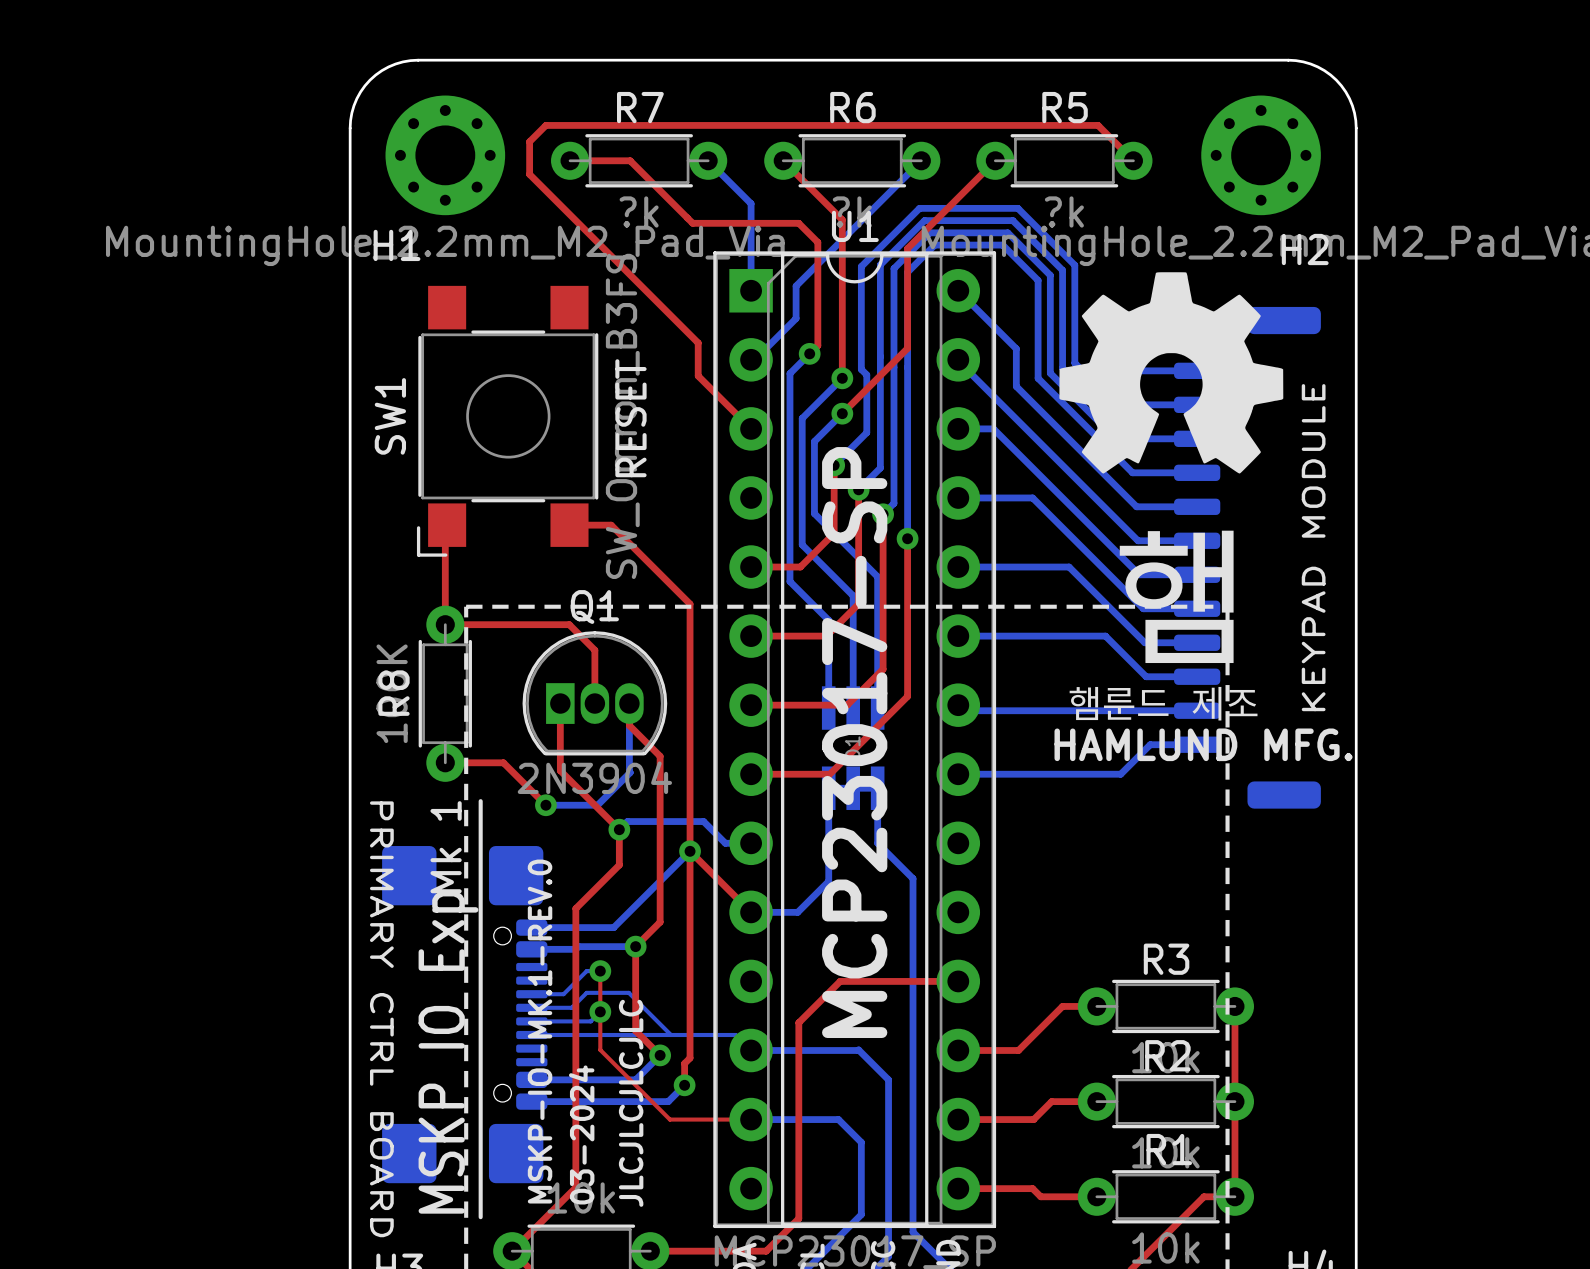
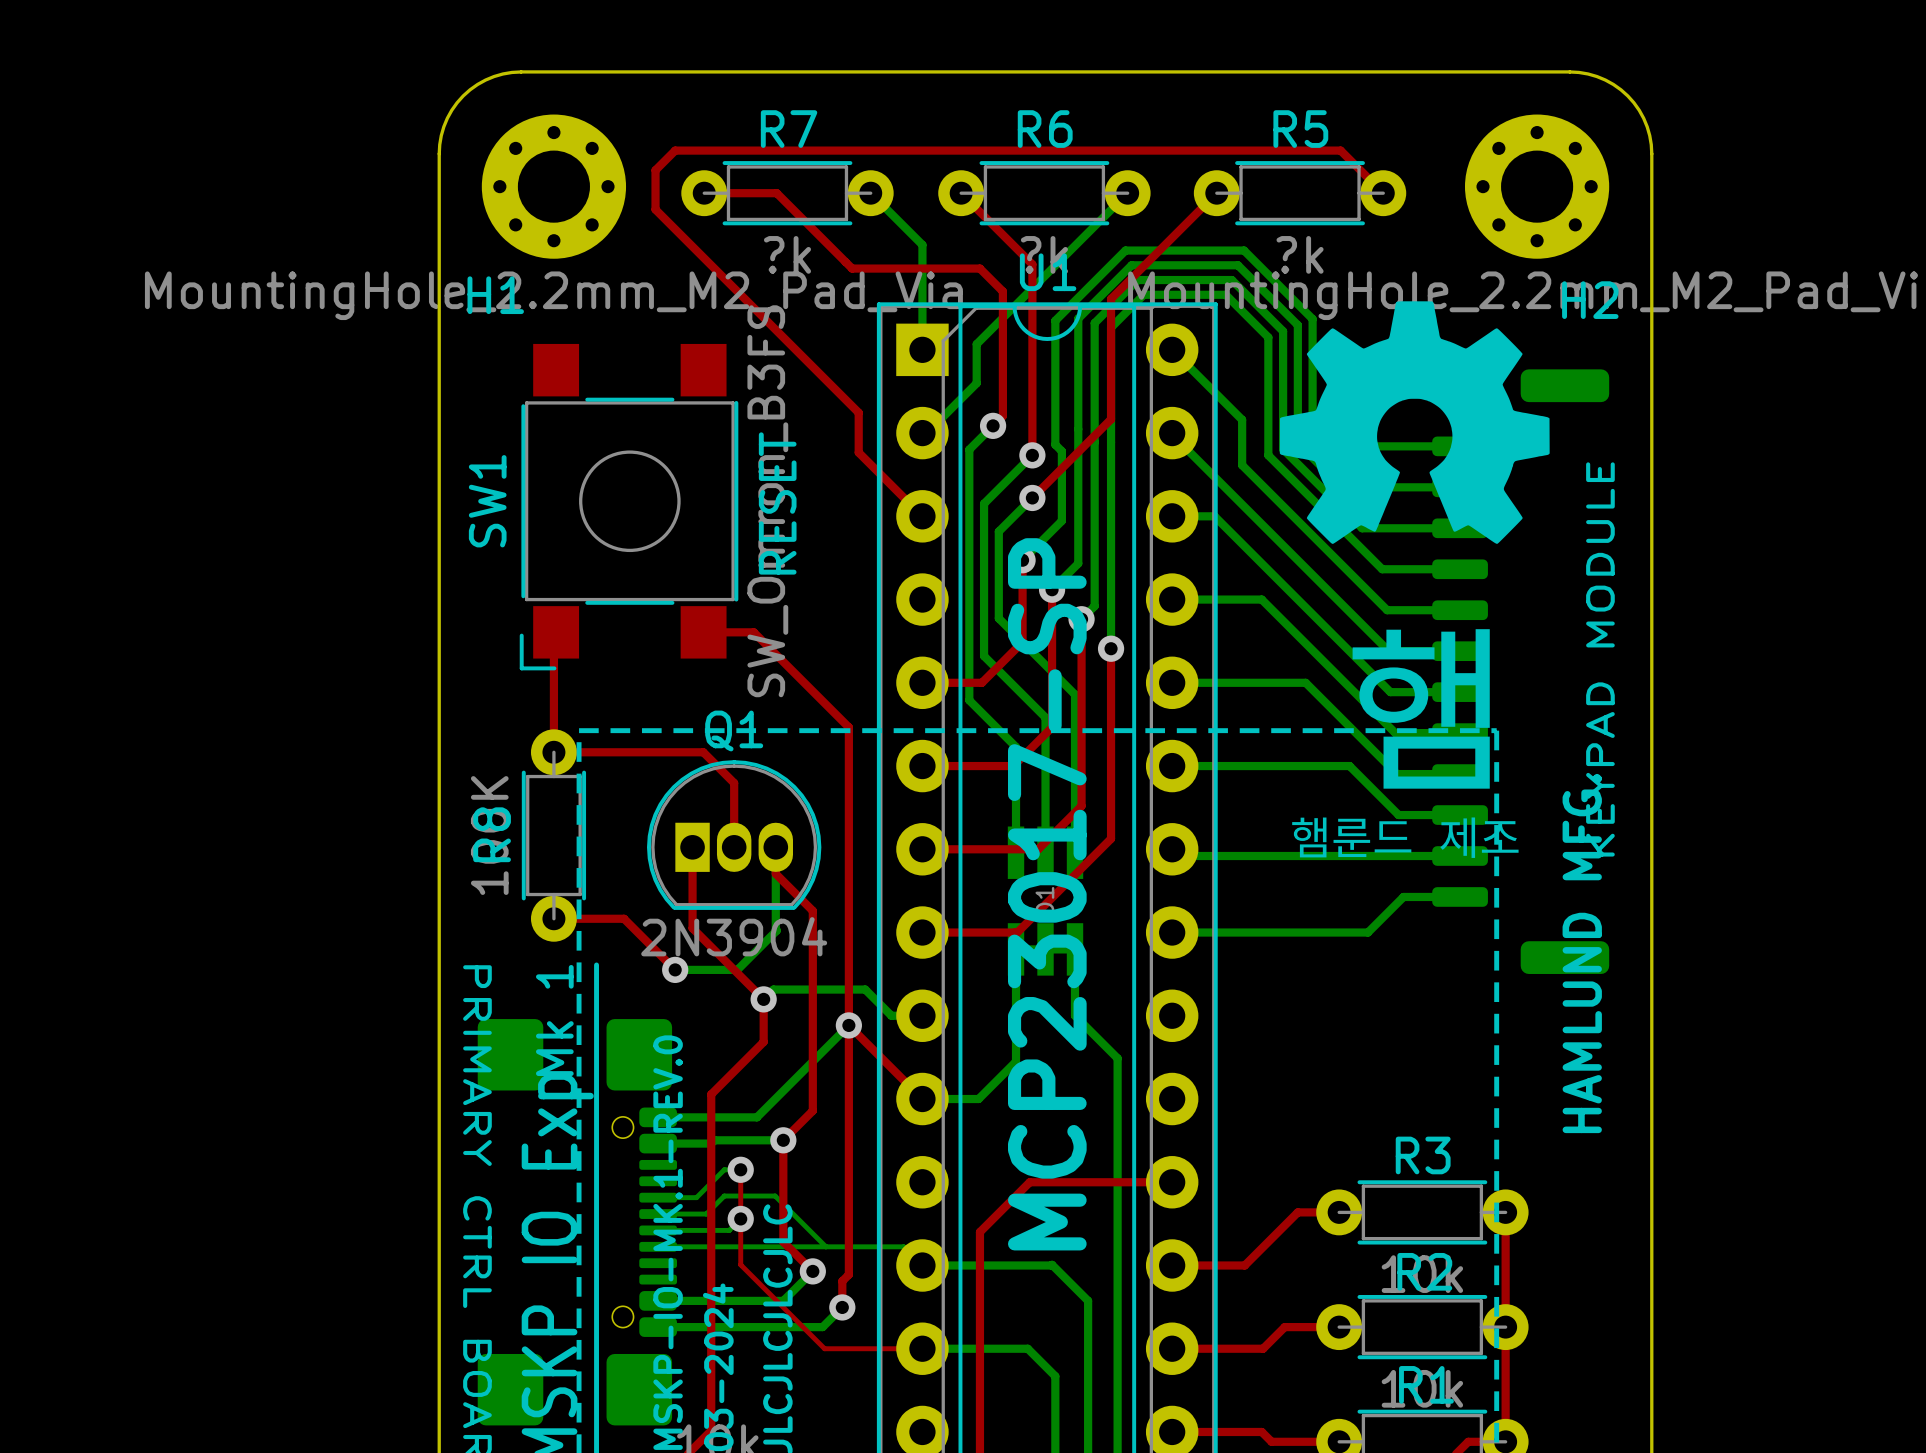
drawing position: (1171, 372) -> (1414, 422)
text position: 햄 (1176, 596) -> 햄 (1421, 708)
text position: 햄룬드 제조 (1163, 703) -> 햄룬드 제조 (1405, 837)
text rotation: 0° (1203, 744) -> 90° counterclockwise (1582, 953)

